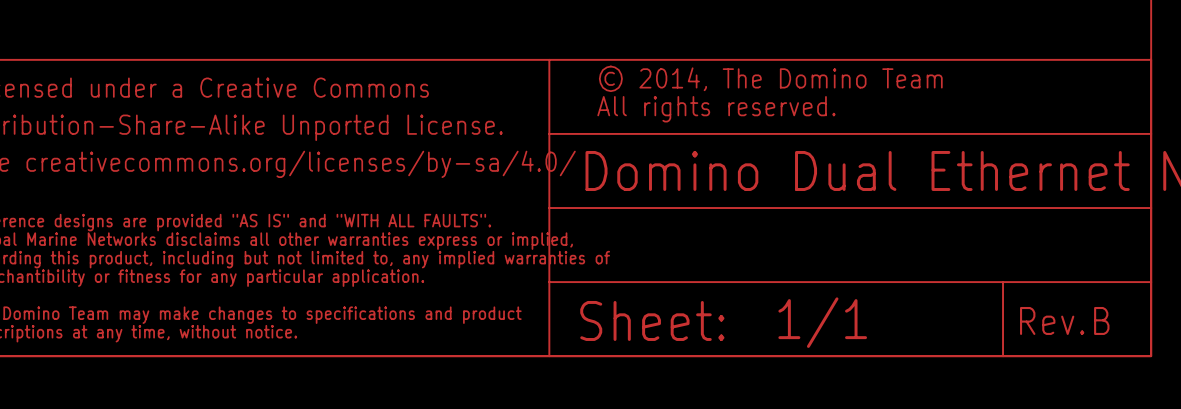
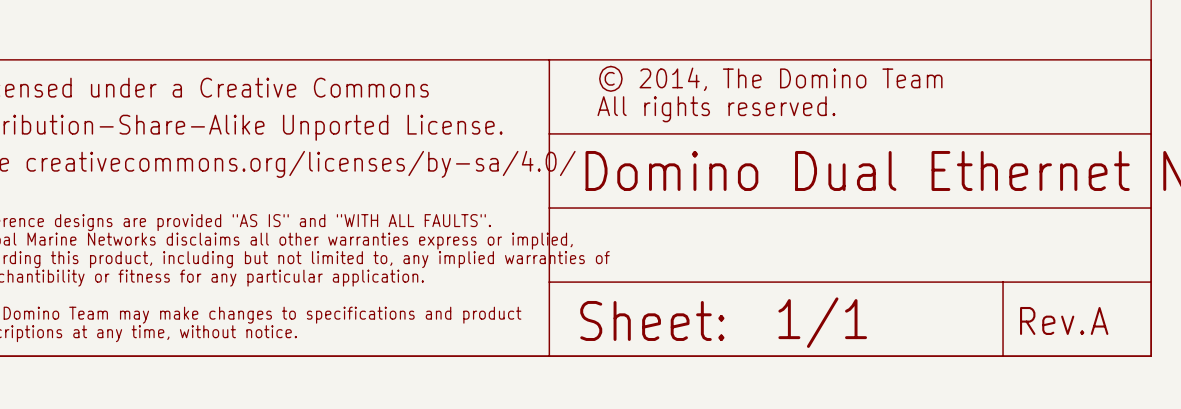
text: B (1101, 320) -> A (1099, 320)

